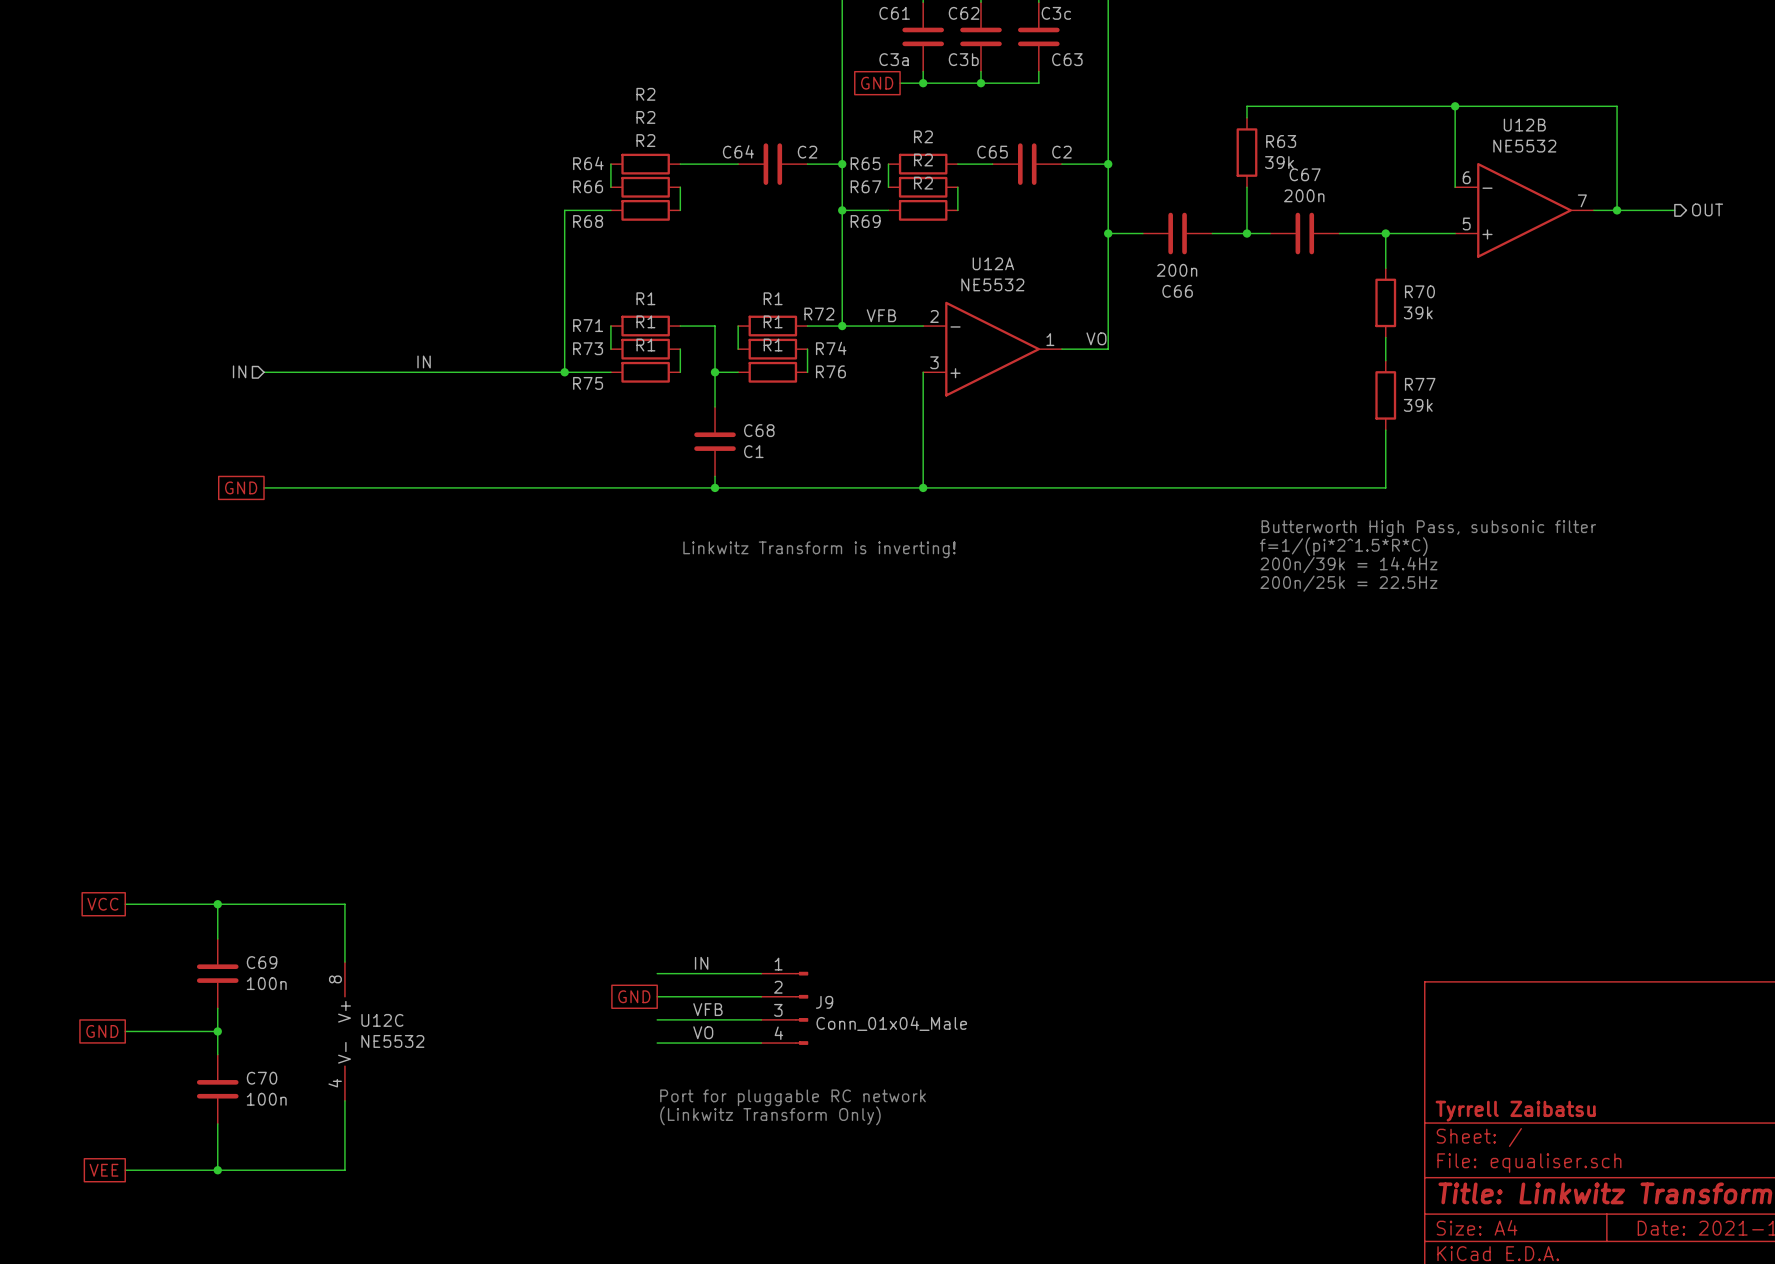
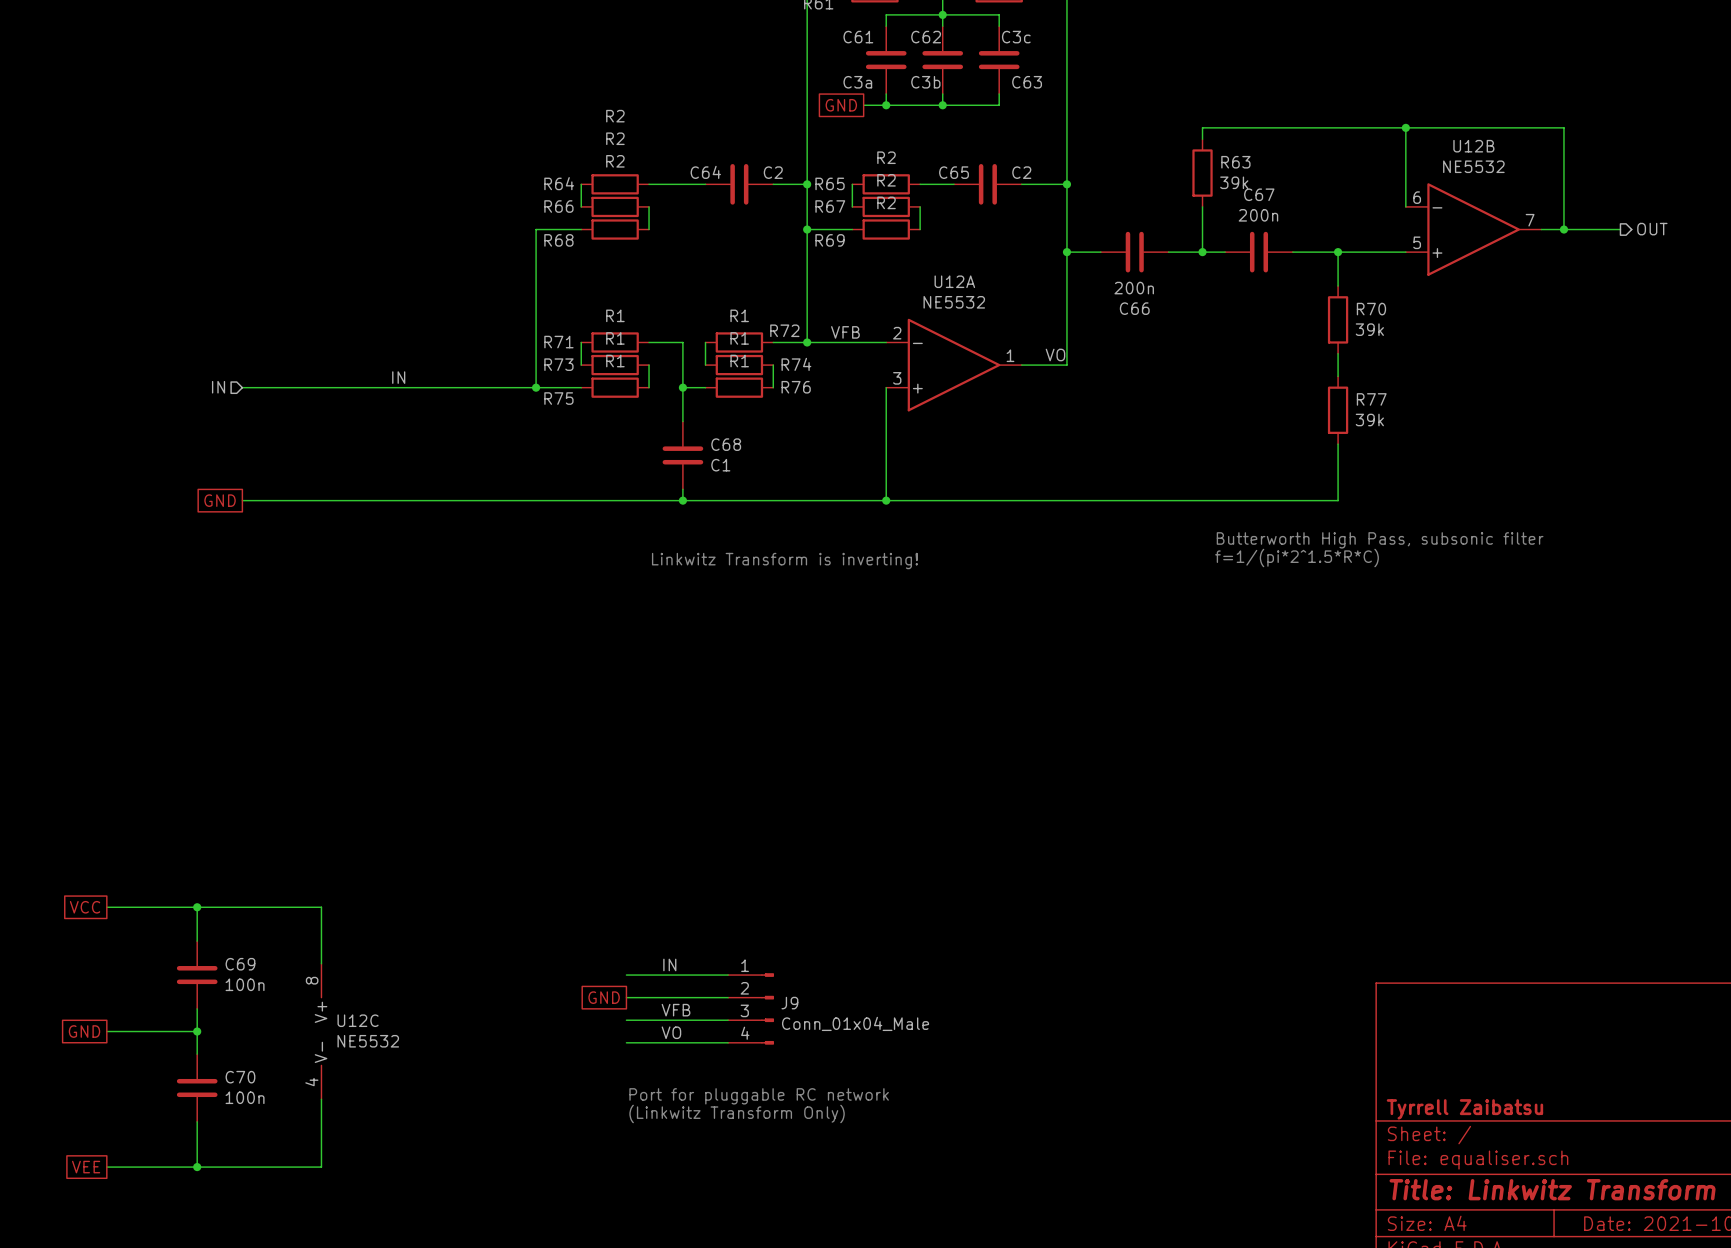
text: 200n/39k = 14.4Hz (1348, 565) -> none
text: 200n/25k = 22.5Hz (1348, 583) -> none

